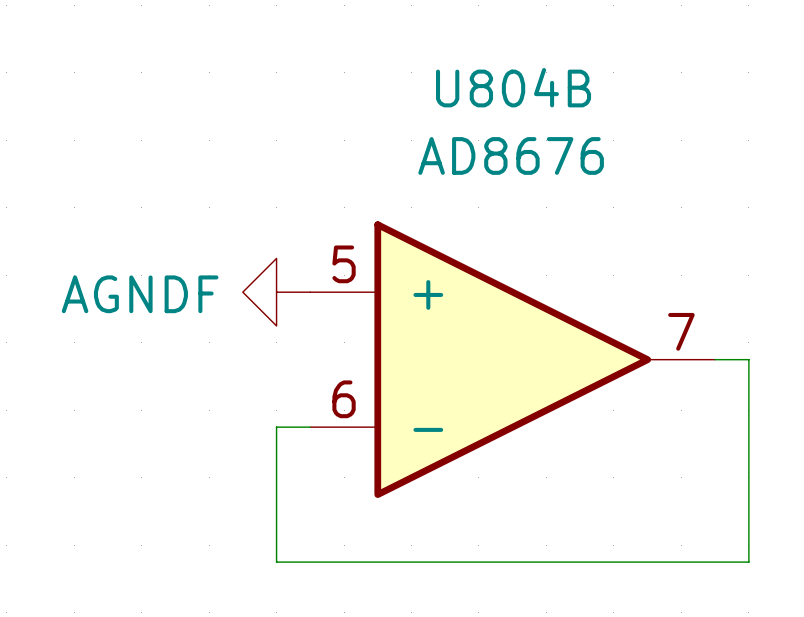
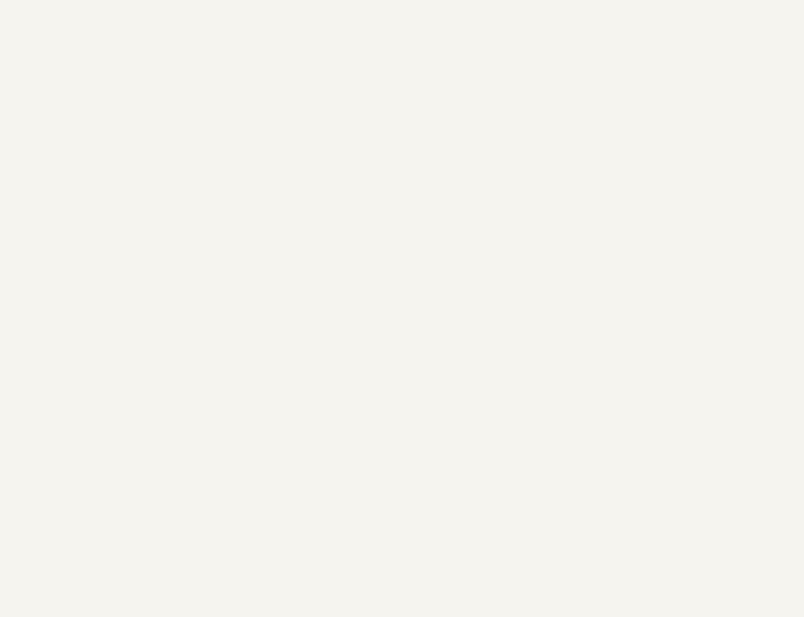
power symbol: AGNDF (276, 292) -> none
U804B: AD8676 (512, 359) -> none
wire: (715, 359) (748, 359) (748, 562) (276, 562) (276, 427) (310, 427) -> none

